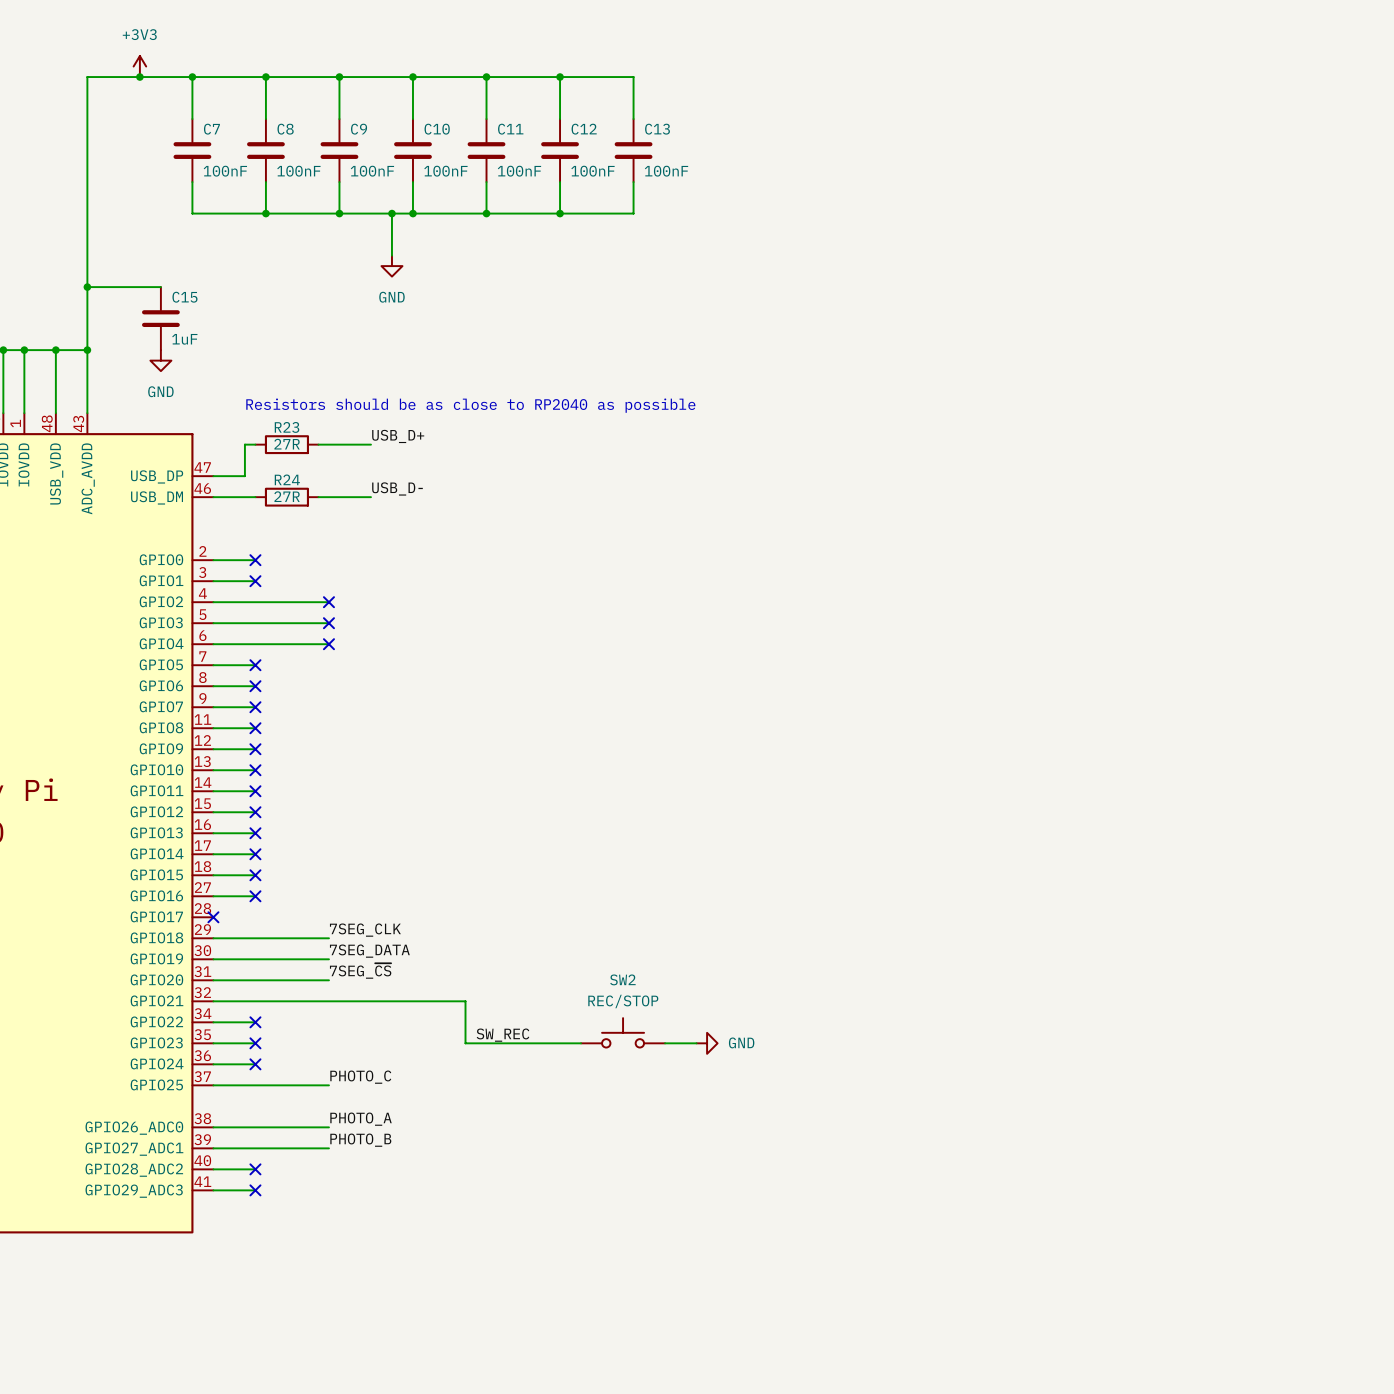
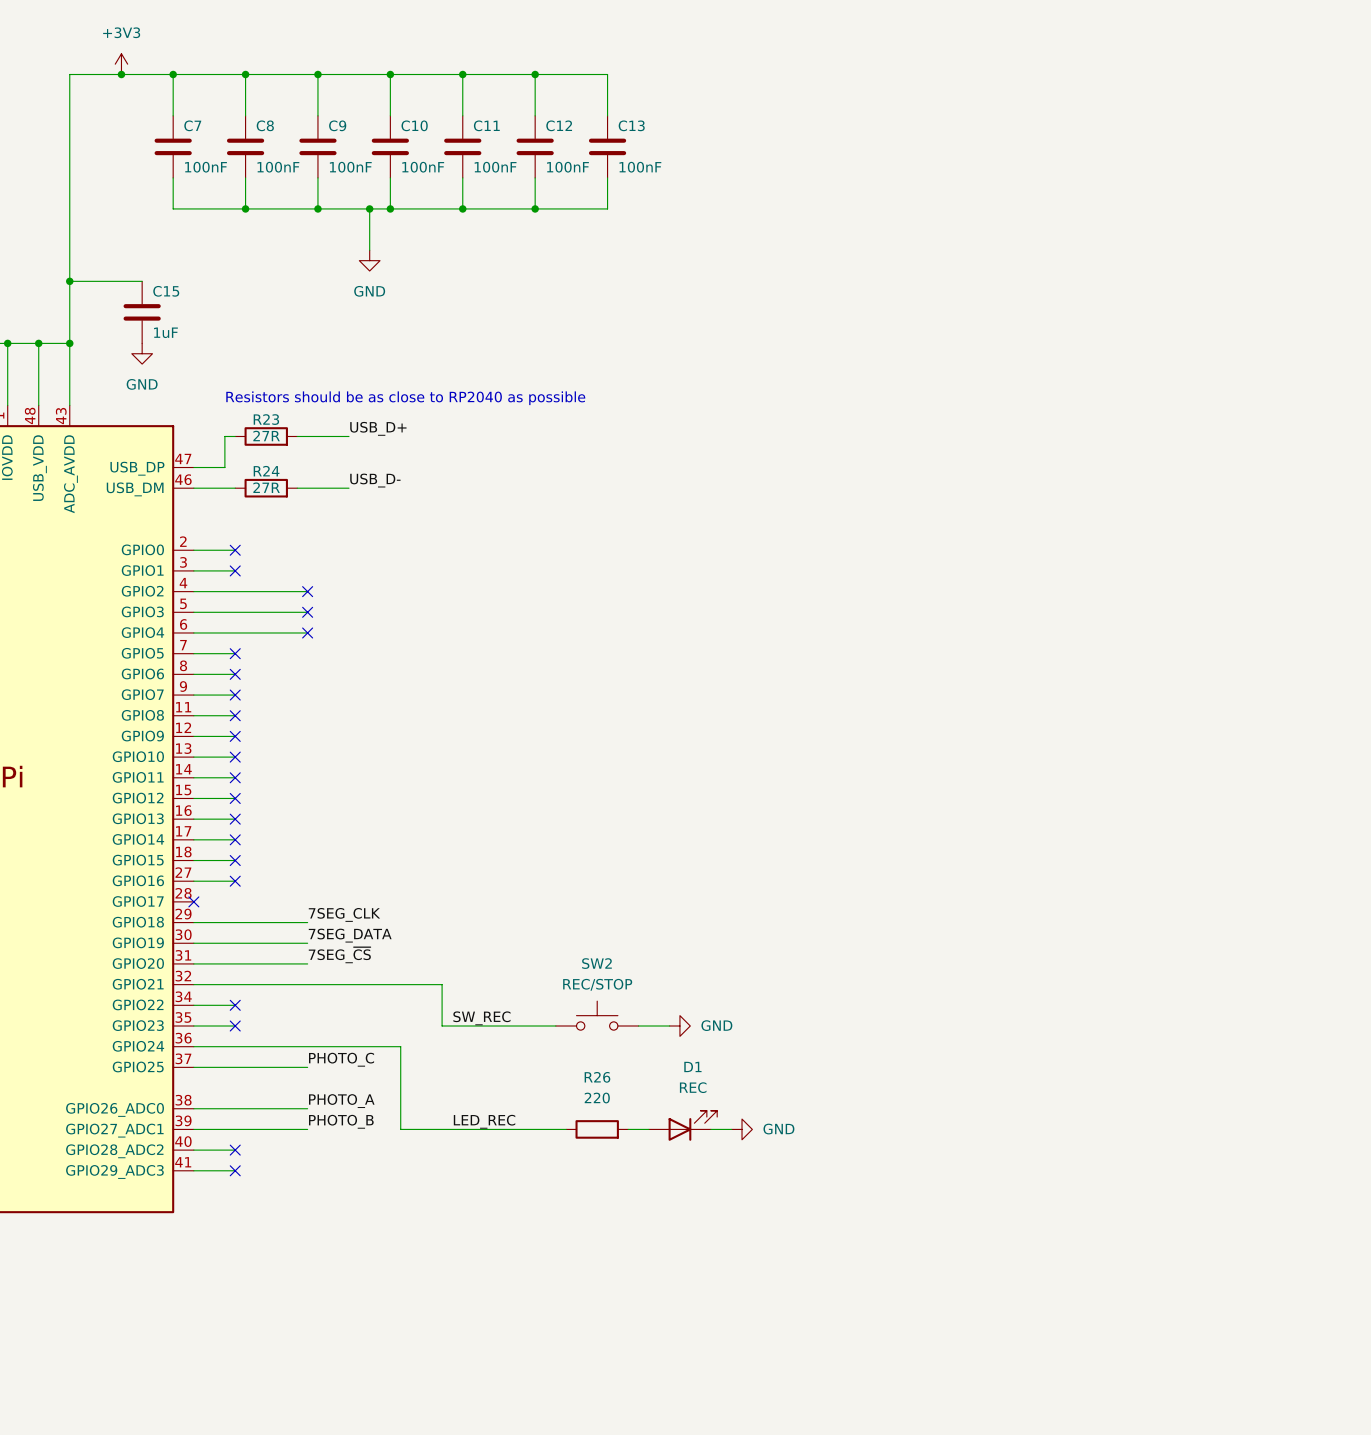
wire: none -> (235, 1046) (400, 1046) (400, 1129) (566, 1129)
no-connect mark: (255, 1064) -> none
label: none -> LED_REC (484, 1121)
D1: none -> REC (683, 1125)
R26: none -> 220 (597, 1129)
wire: none -> (628, 1129) (648, 1129)
wire: none -> (710, 1129) (731, 1129)
power symbol: none -> GND (742, 1129)

